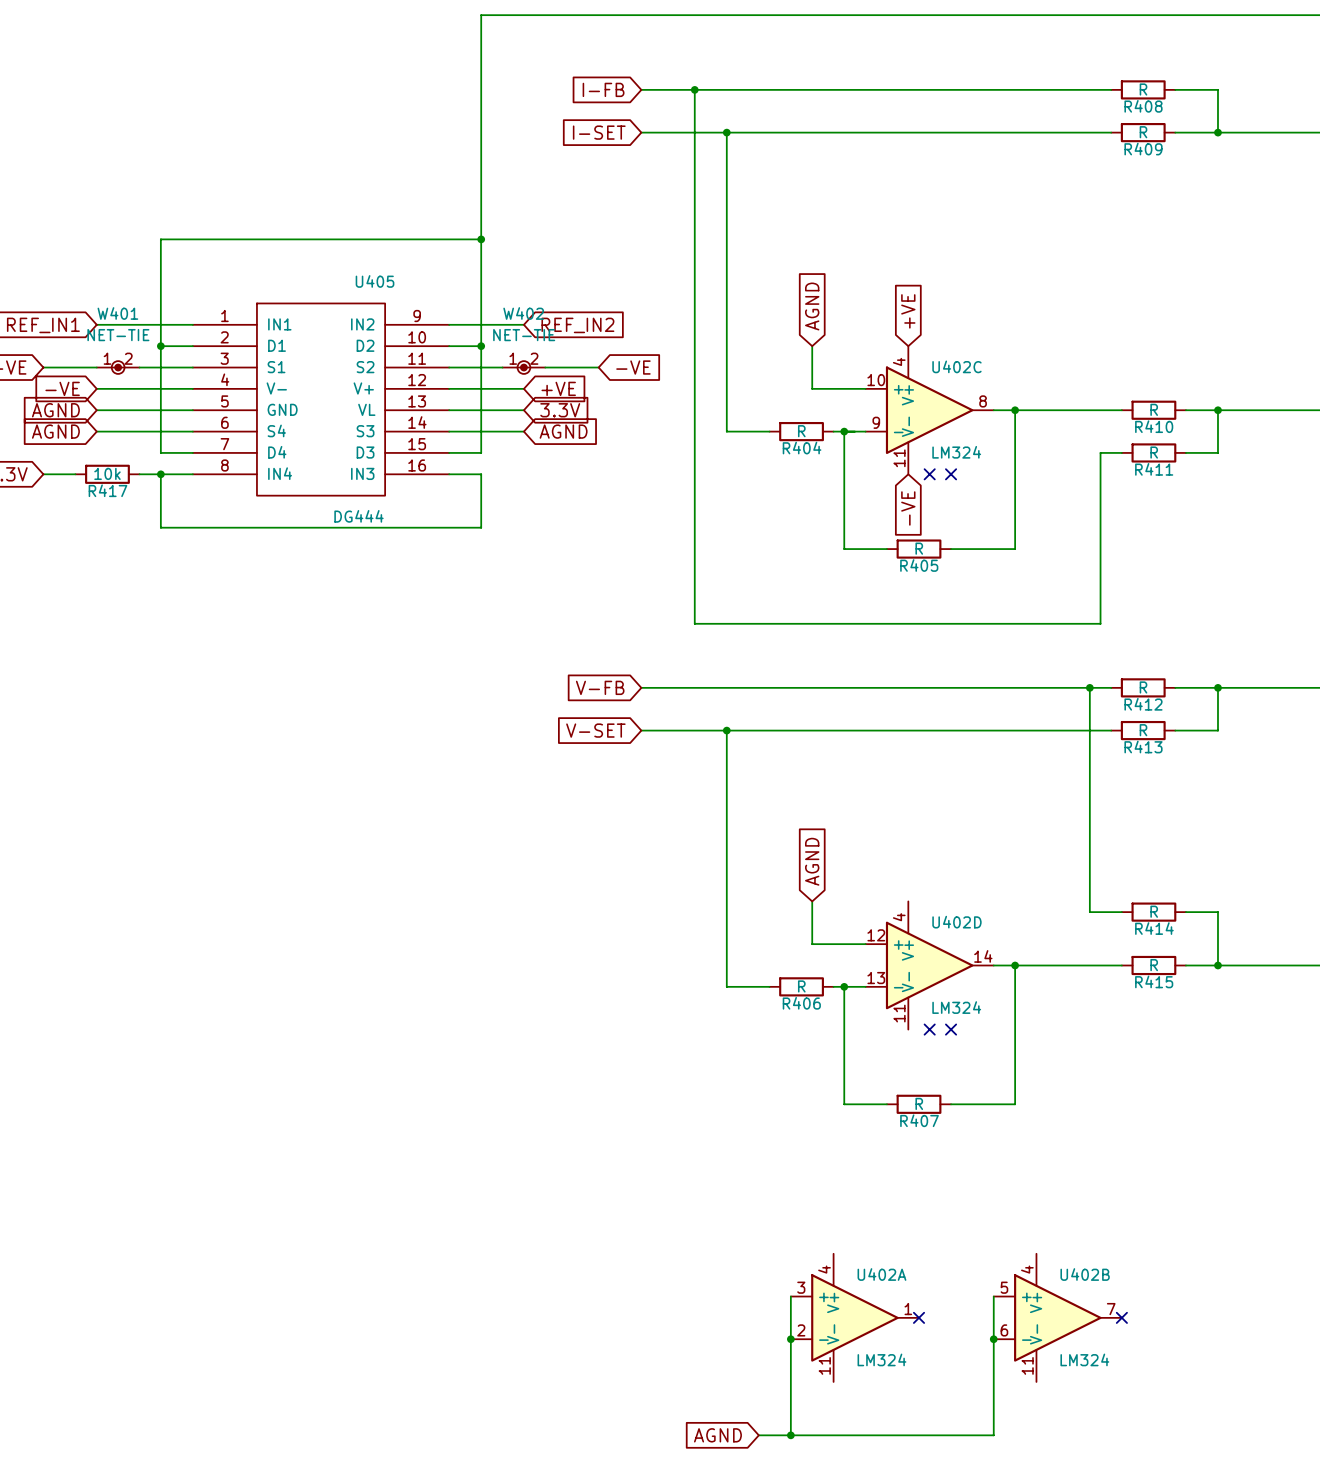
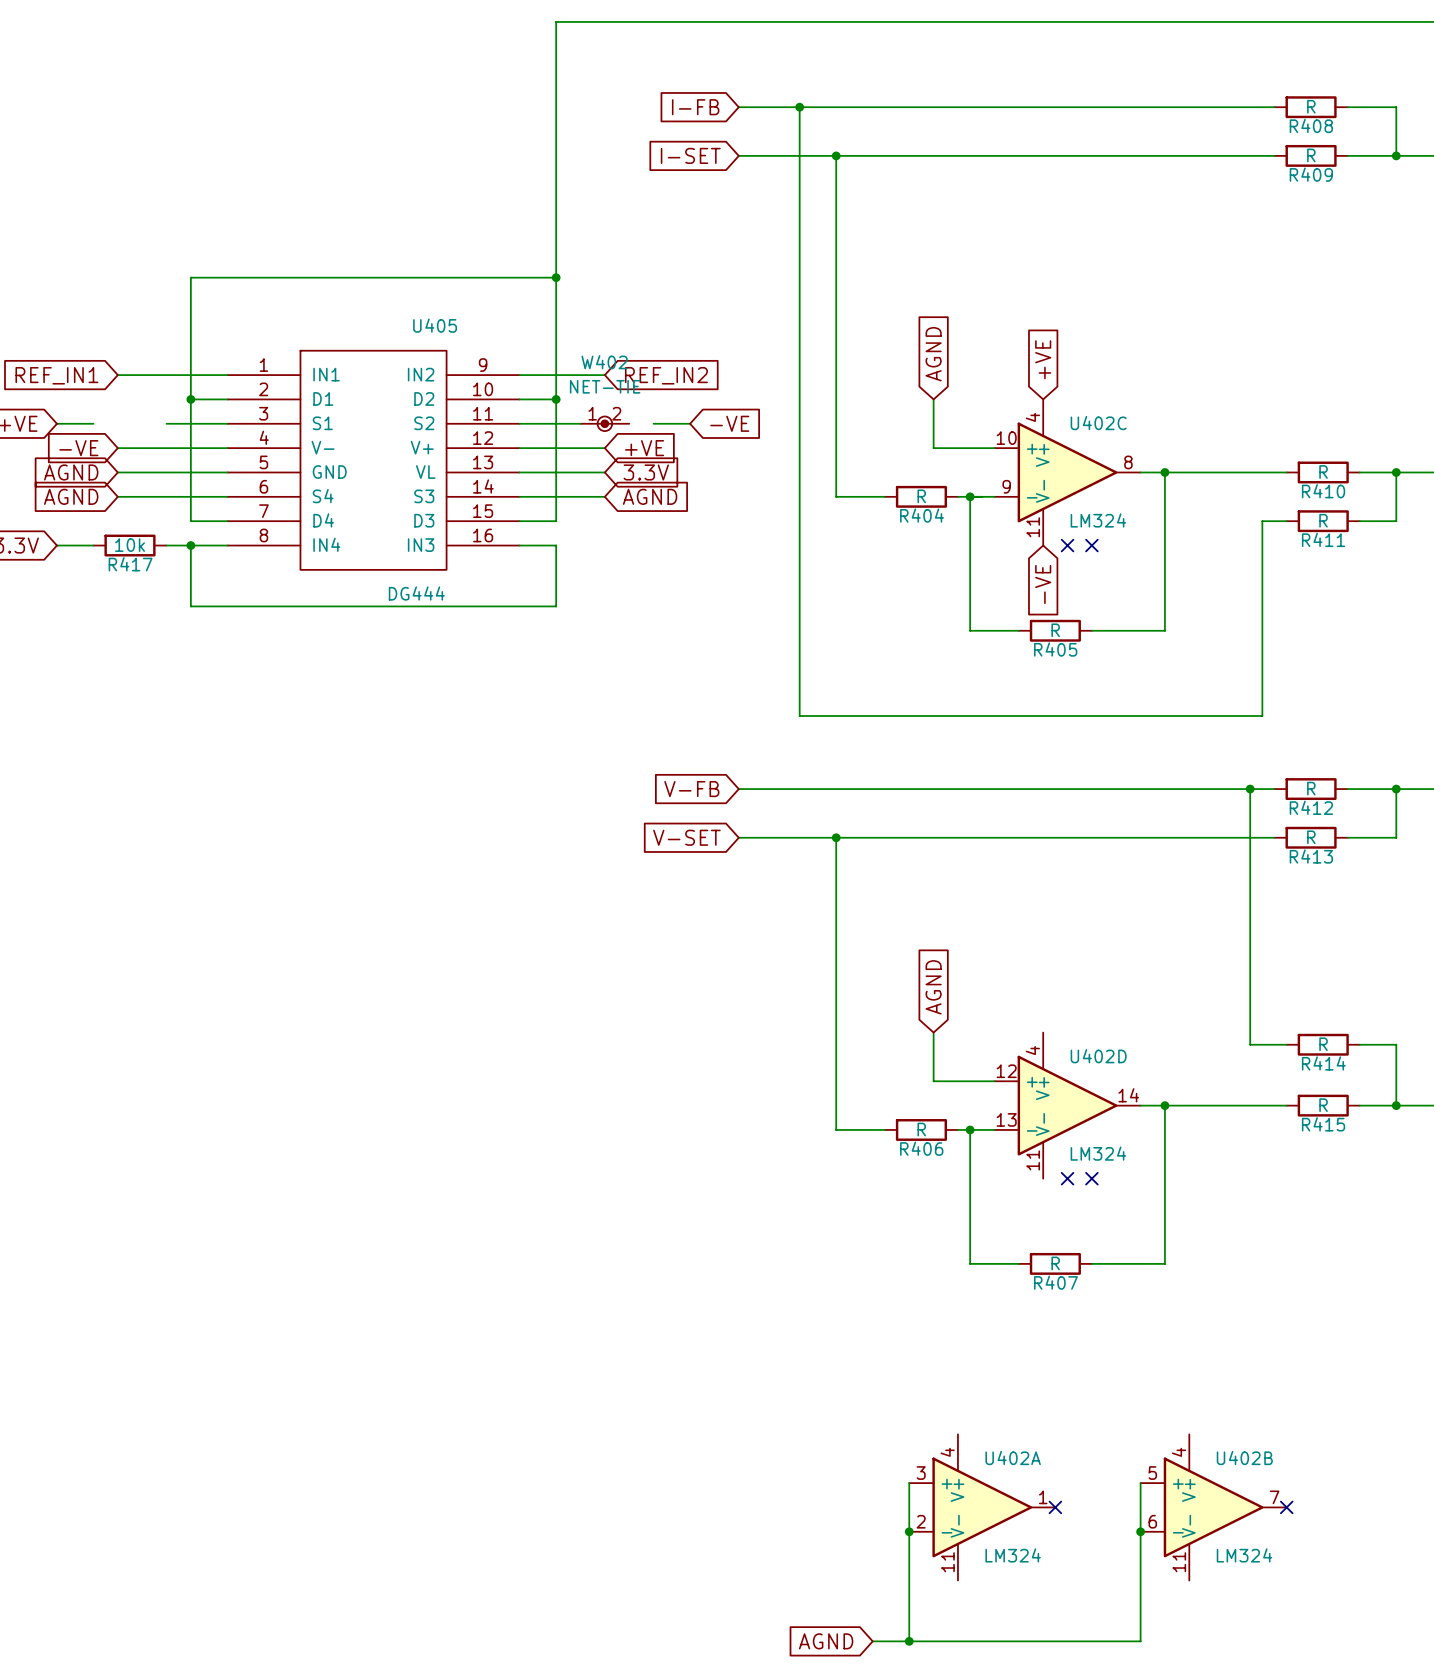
wire: (75, 367) (96, 367) -> none
W401: NET-TIE (118, 367) -> none
wire: (545, 367) (566, 367) -> none

